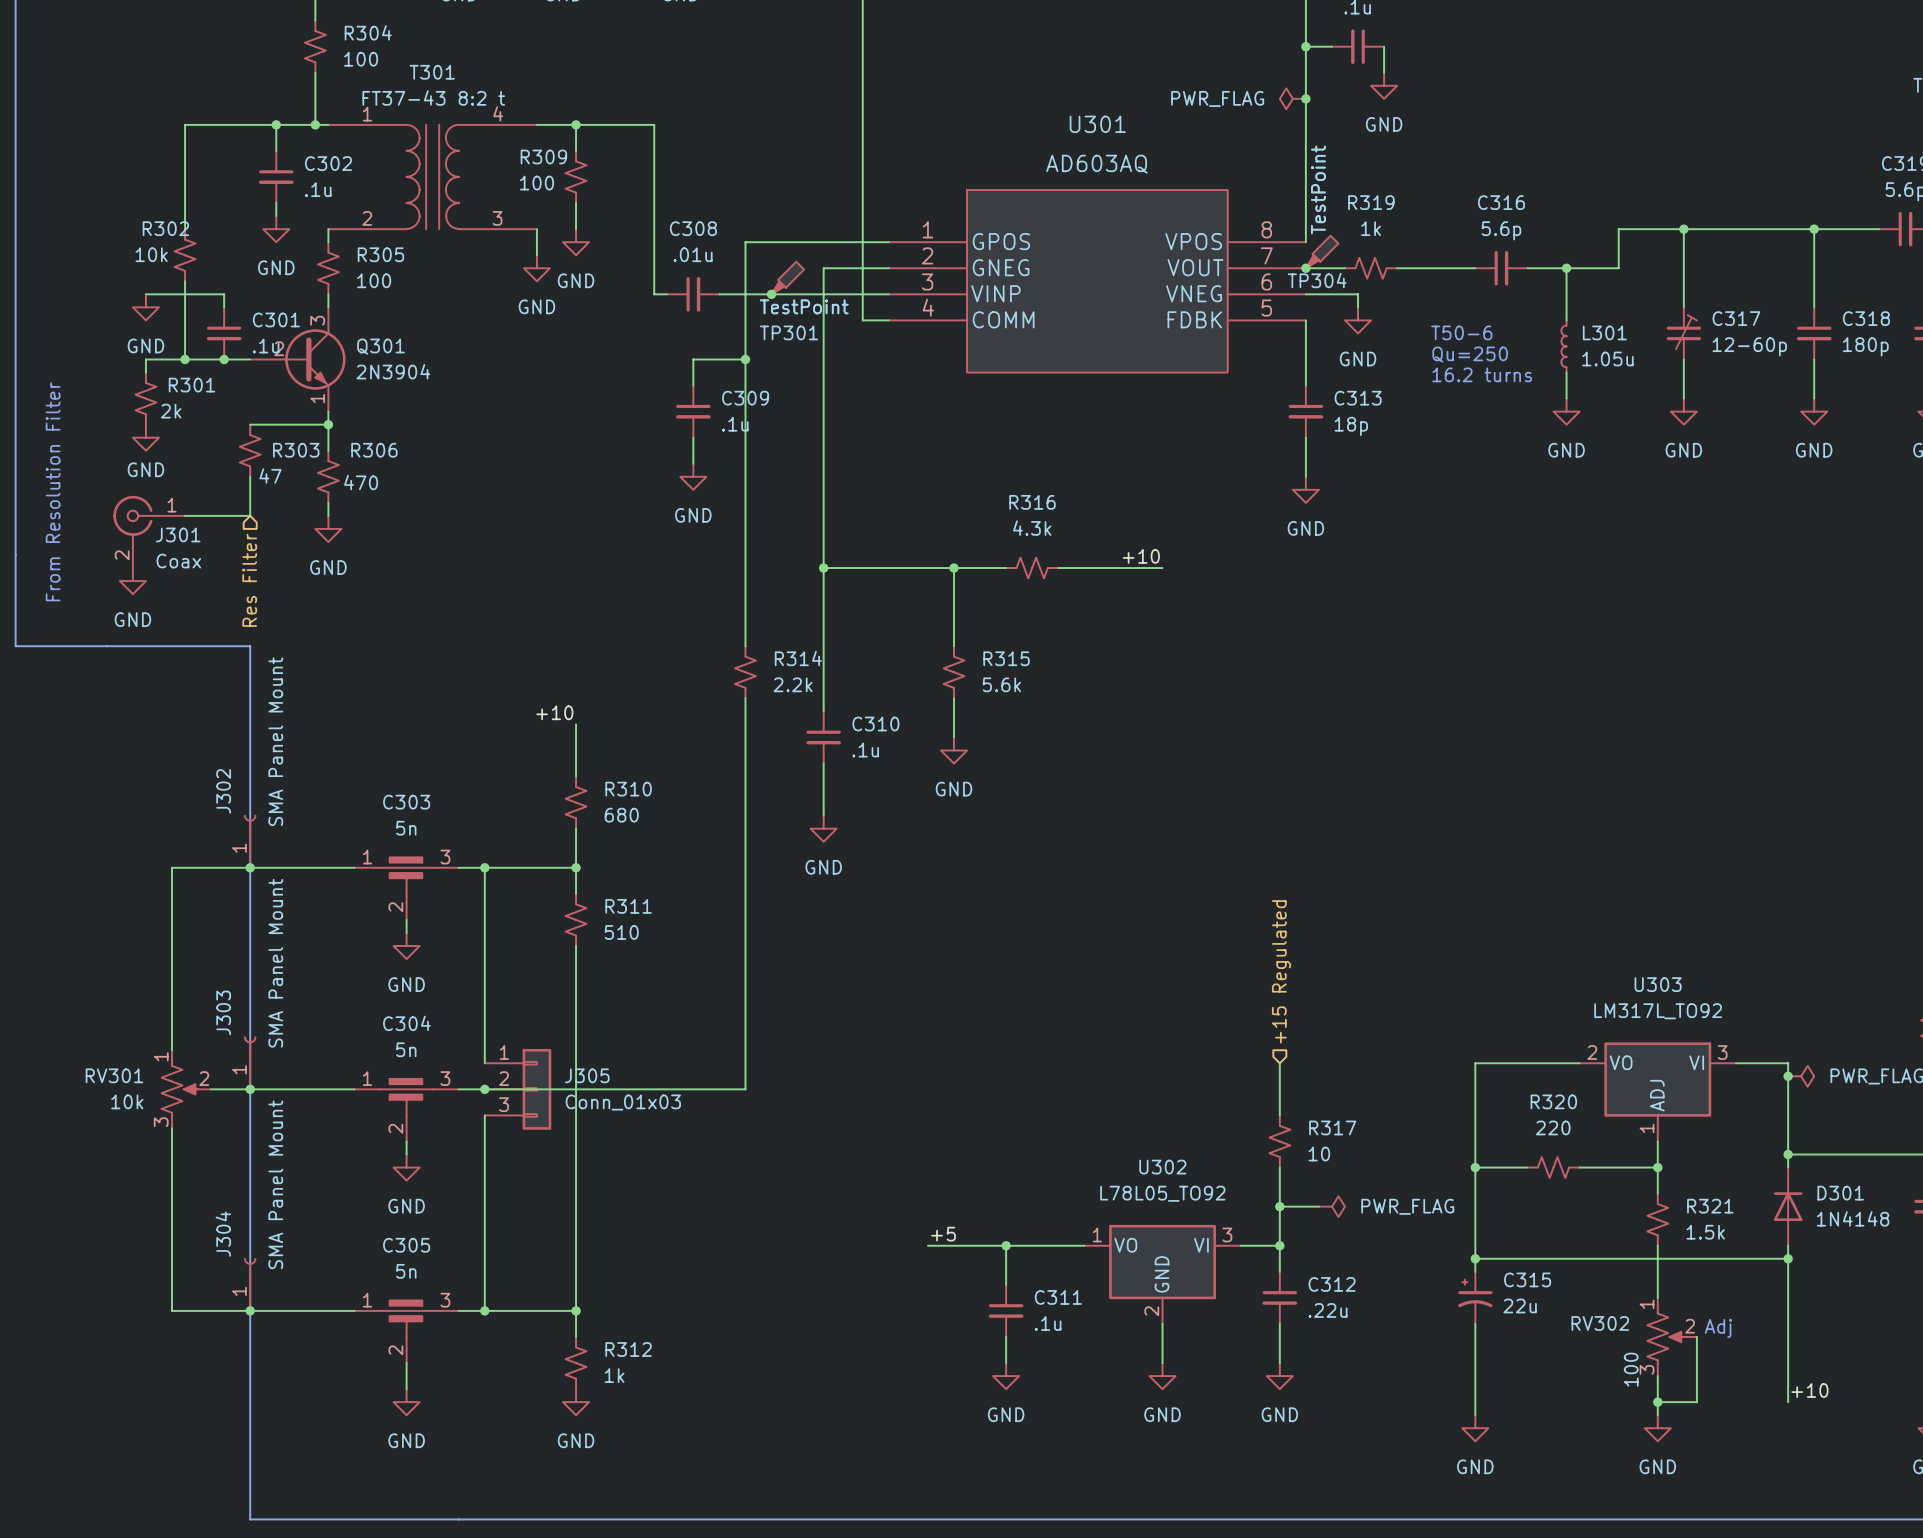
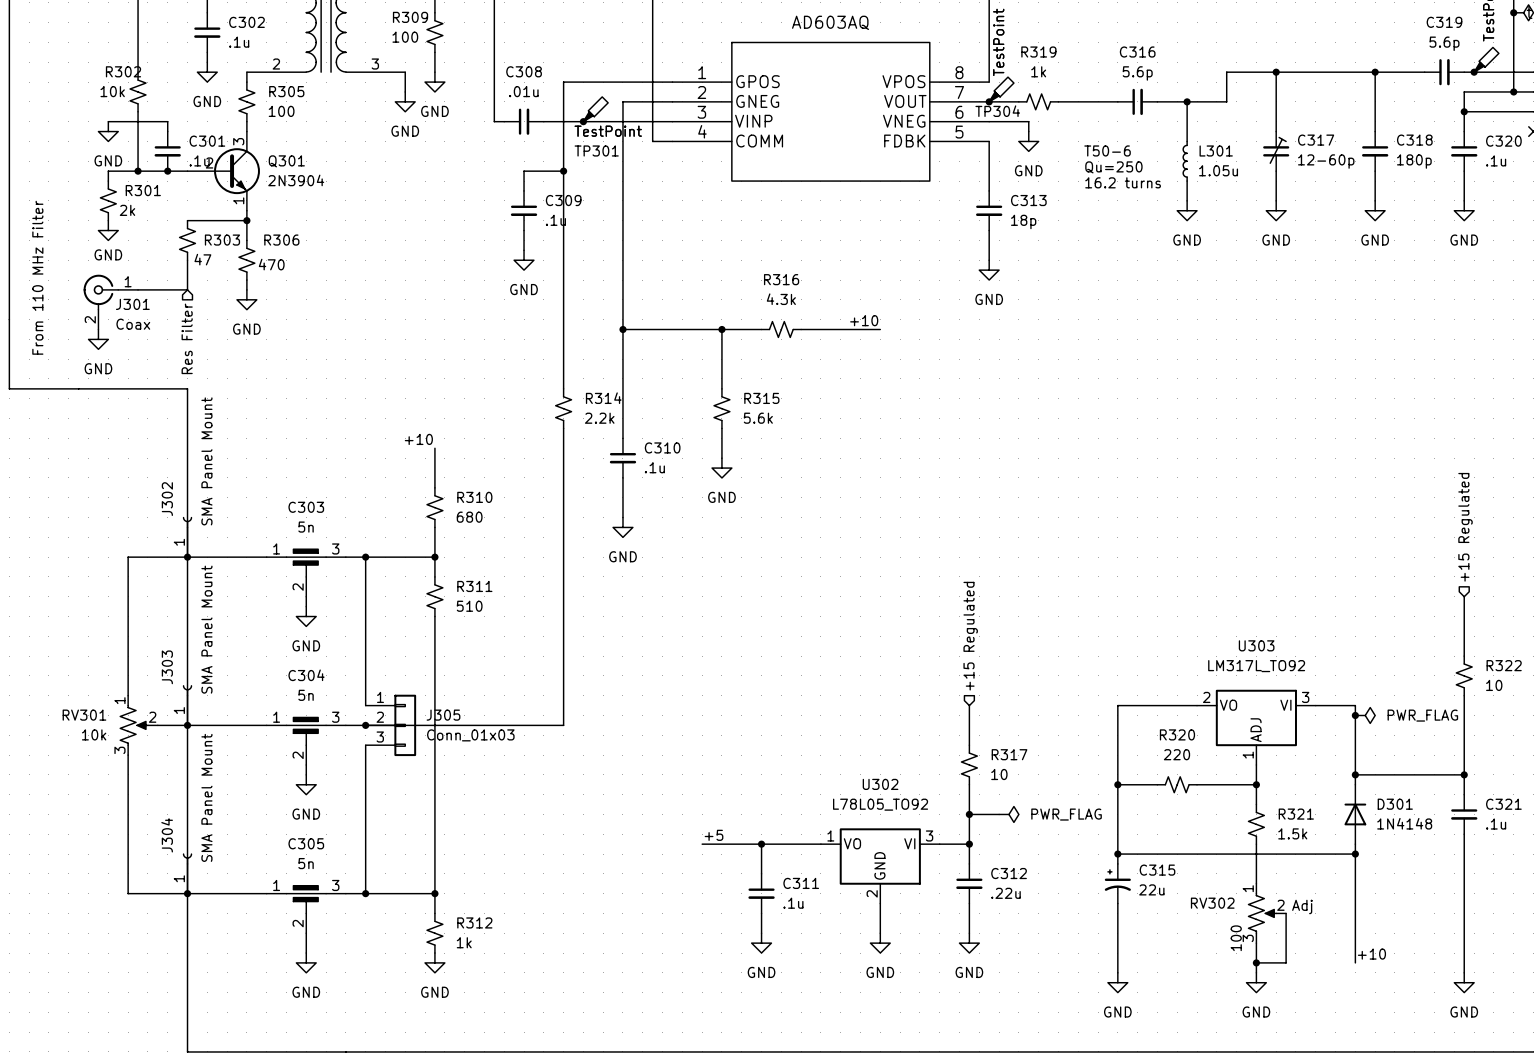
text: From Resolution Filter (53, 491) -> From 110 MHz Filter (37, 277)

